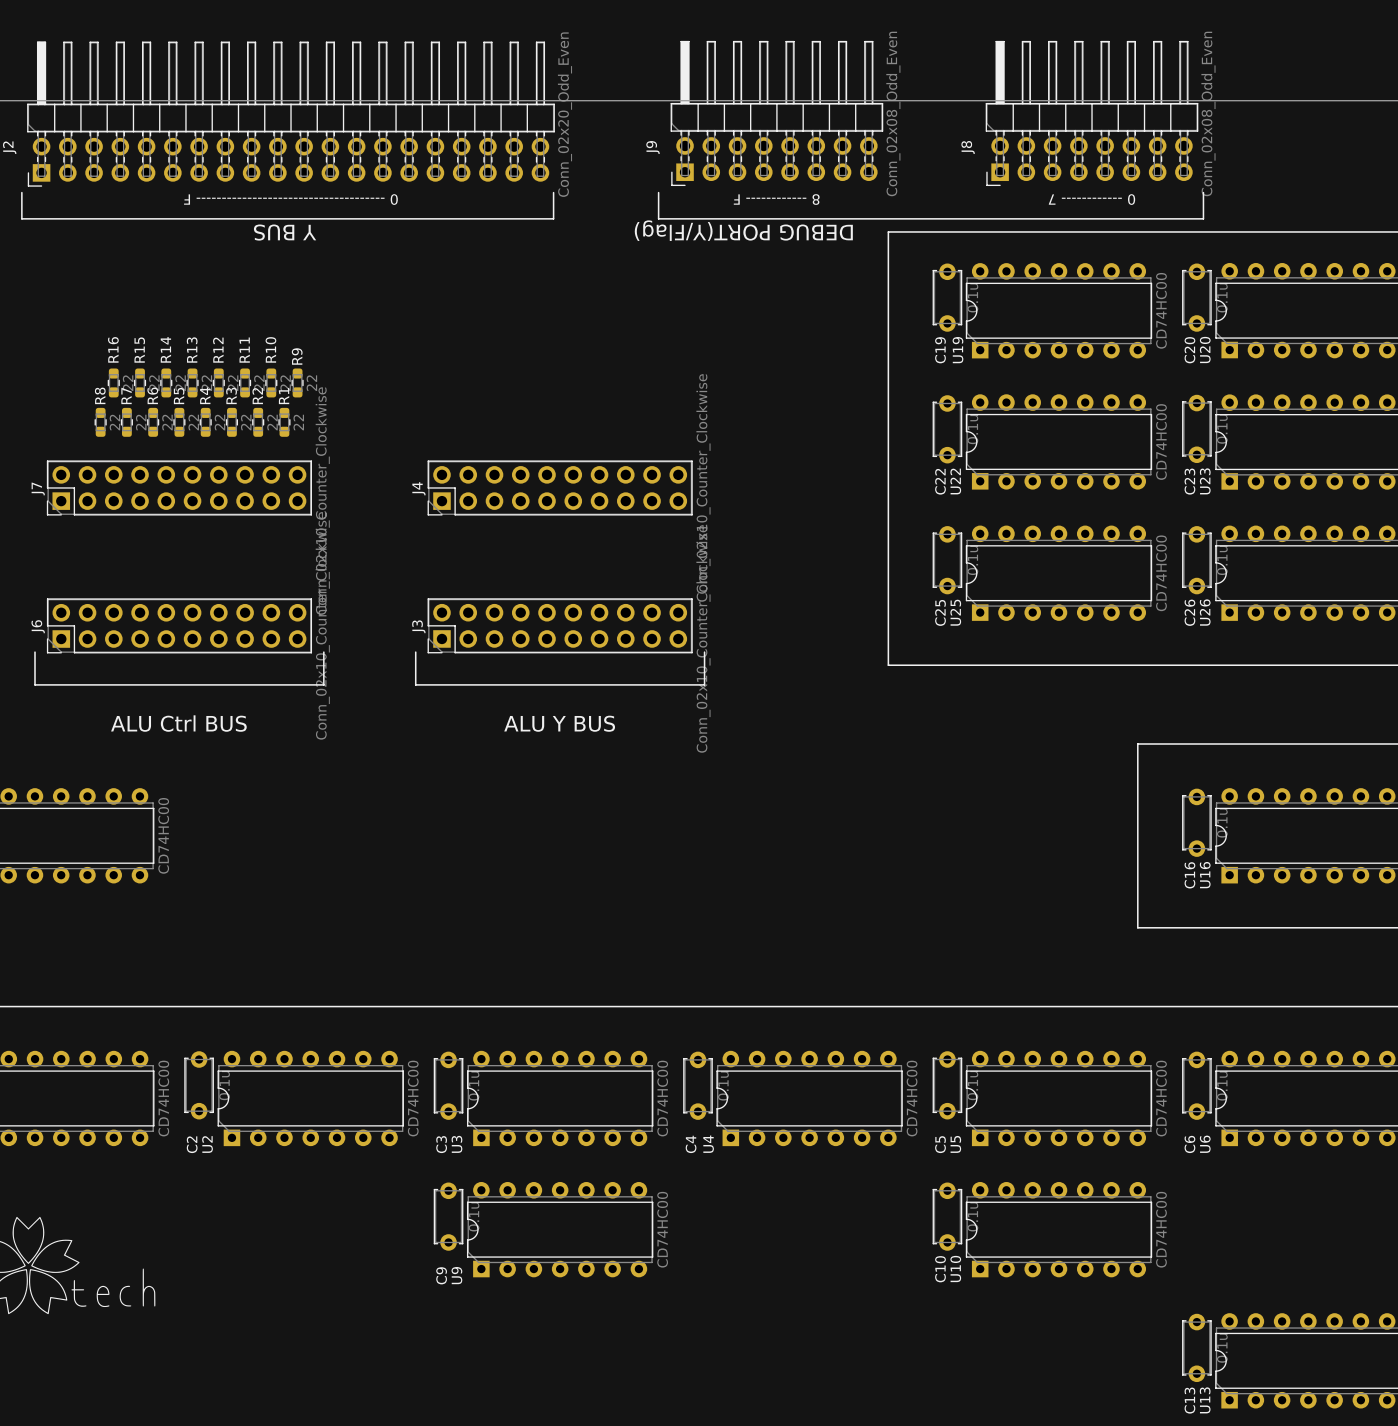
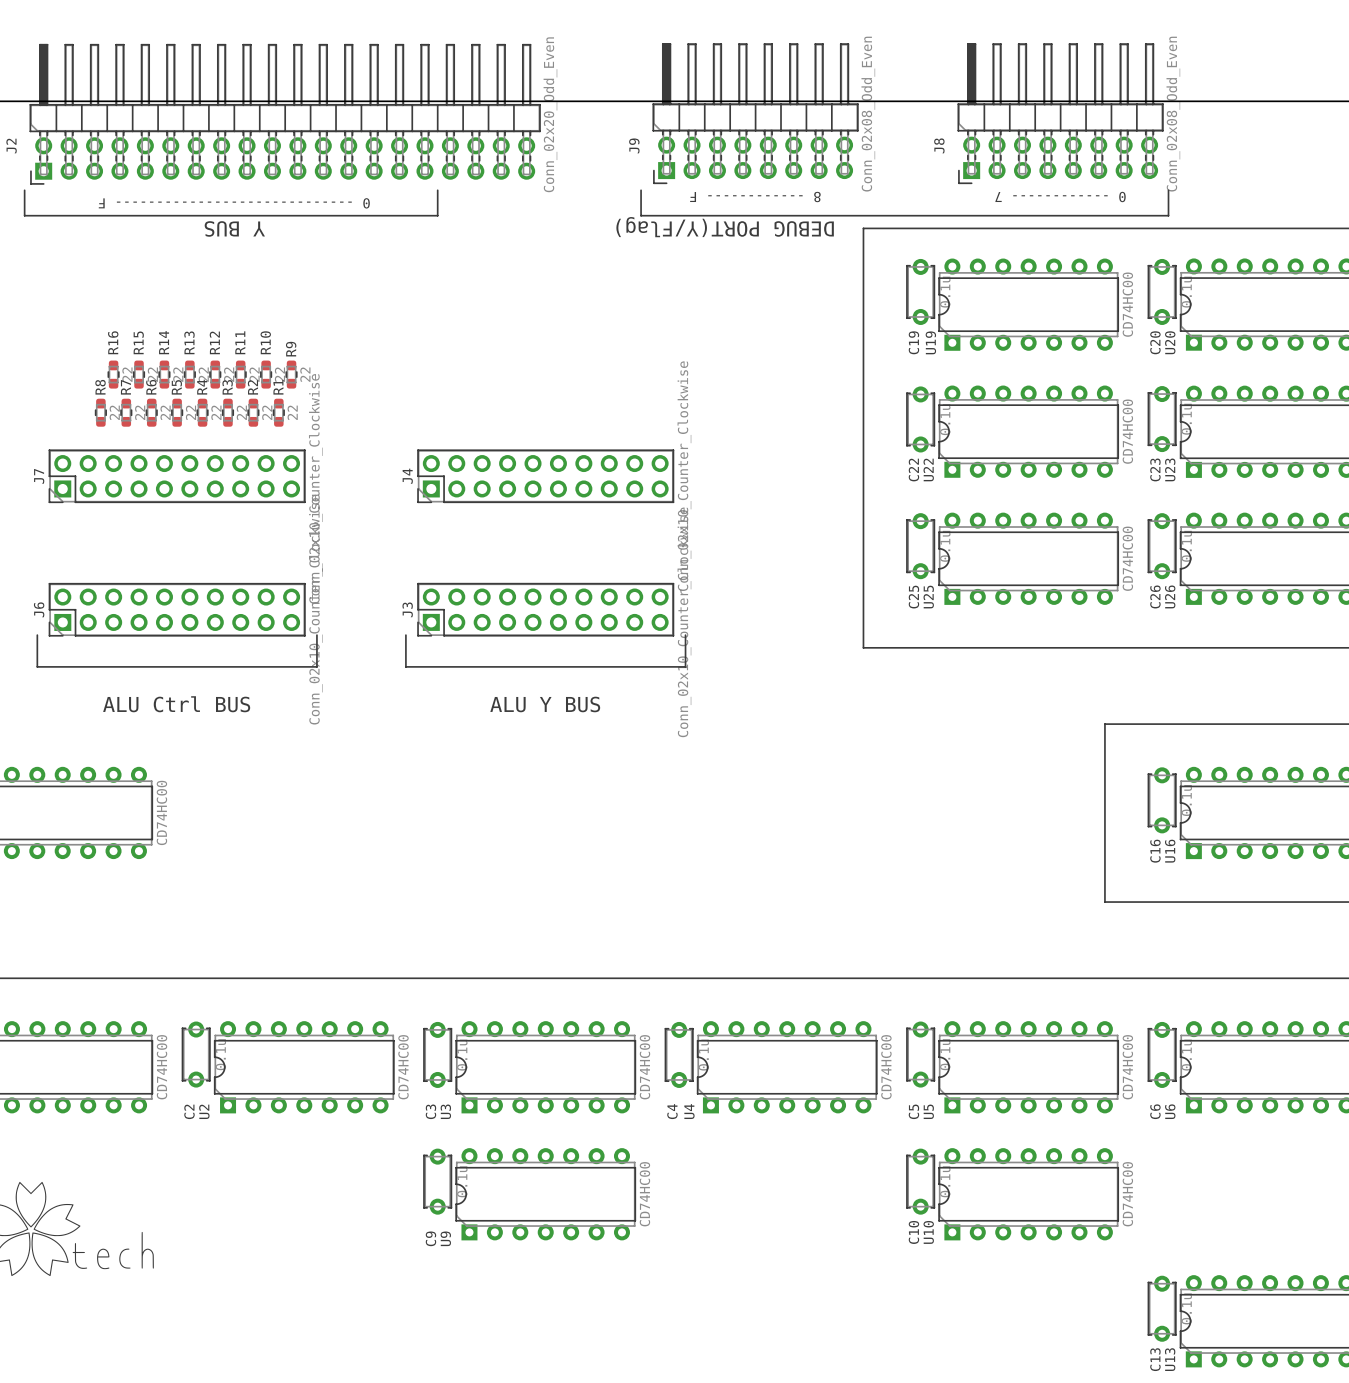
line: (553, 192) (553, 218) (448, 218) -> (437, 190) (437, 215)
text: 0 ------------------------------------- F (290, 199) -> 0 ----------------------------- F (234, 203)
text position: Y BUS (285, 232) -> Y BUS (234, 228)

